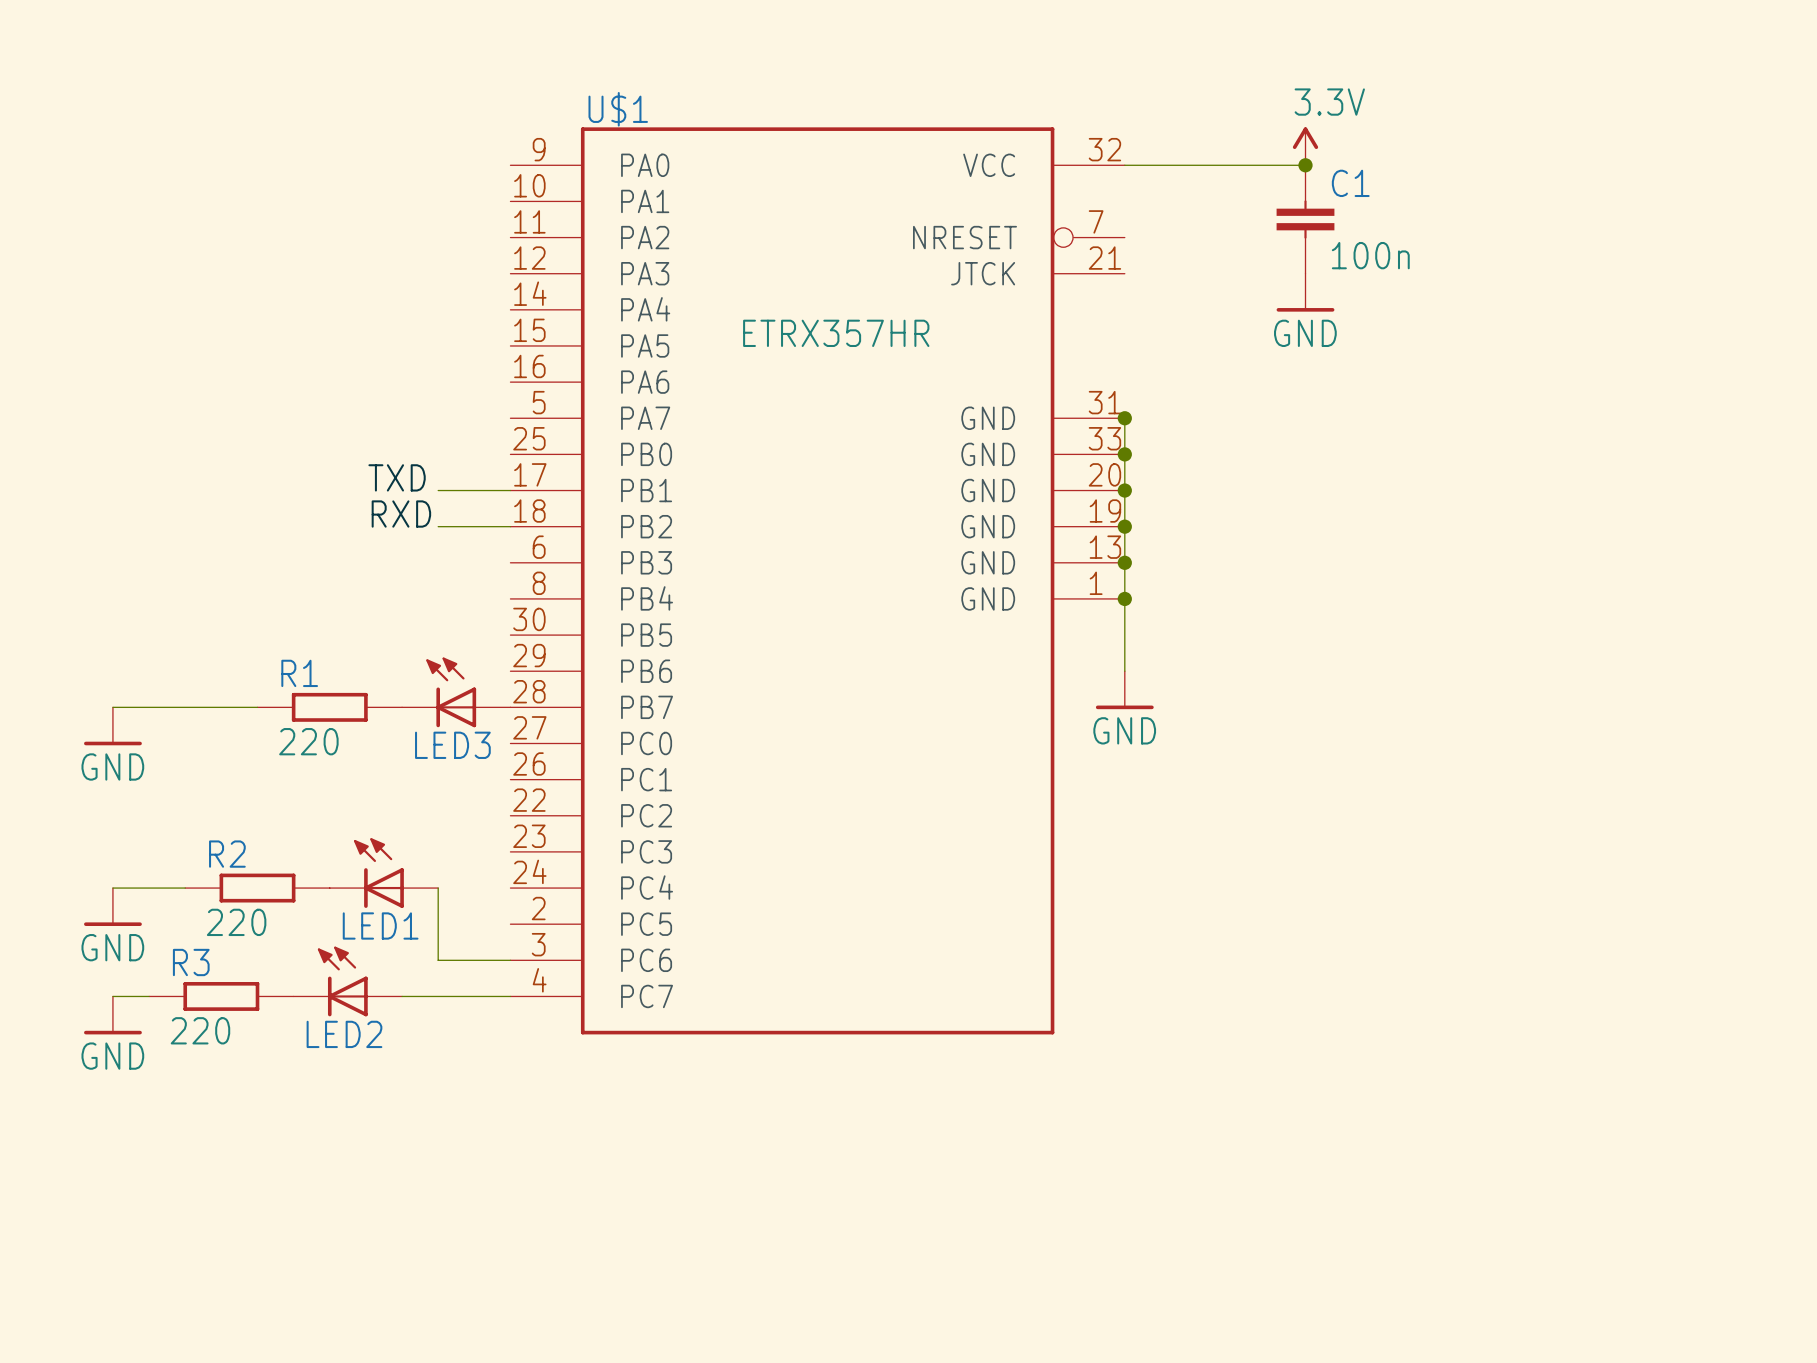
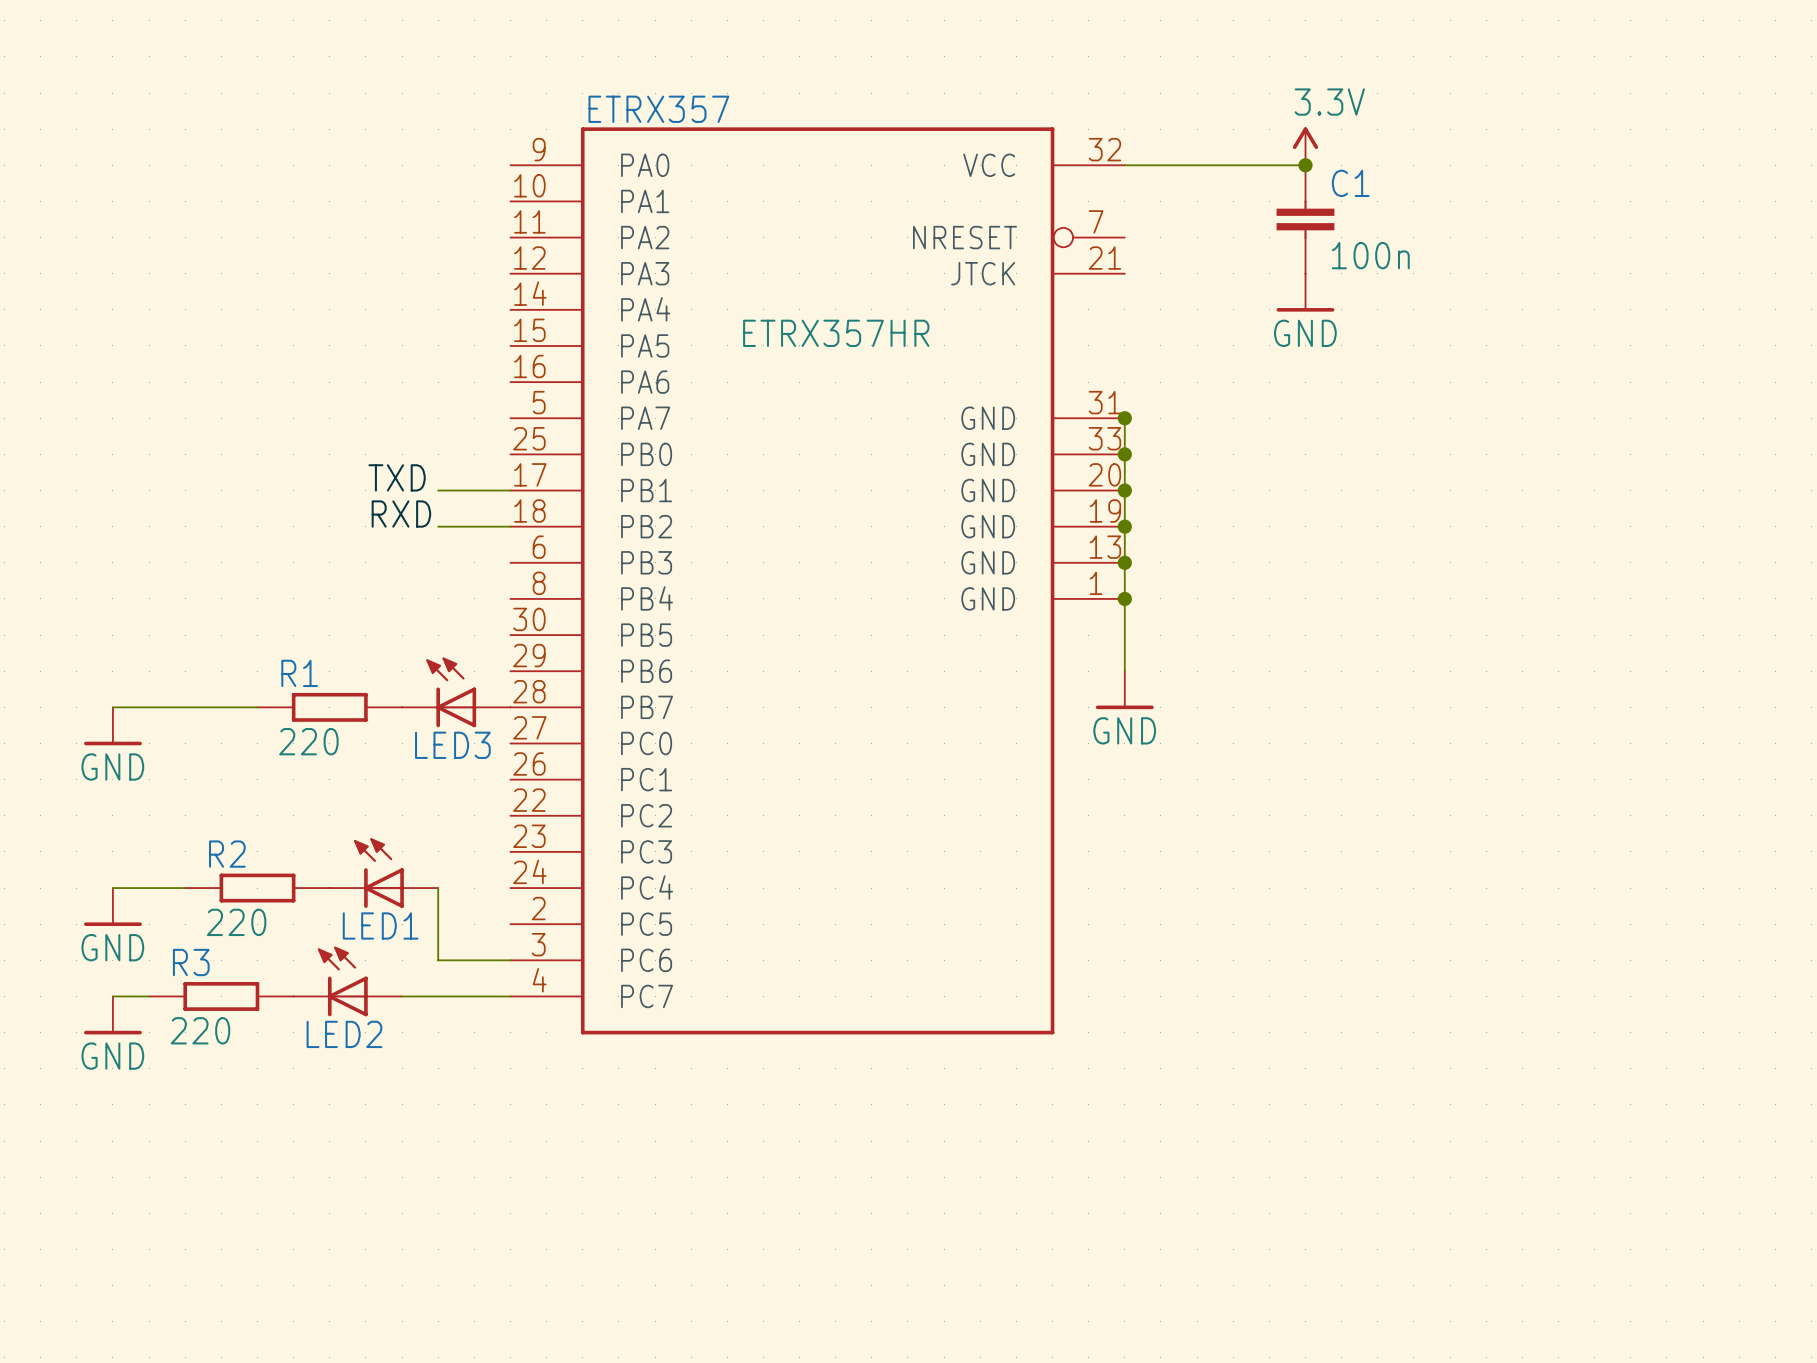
U$1 name: U$1 (618, 109) -> ETRX357 (658, 109)

